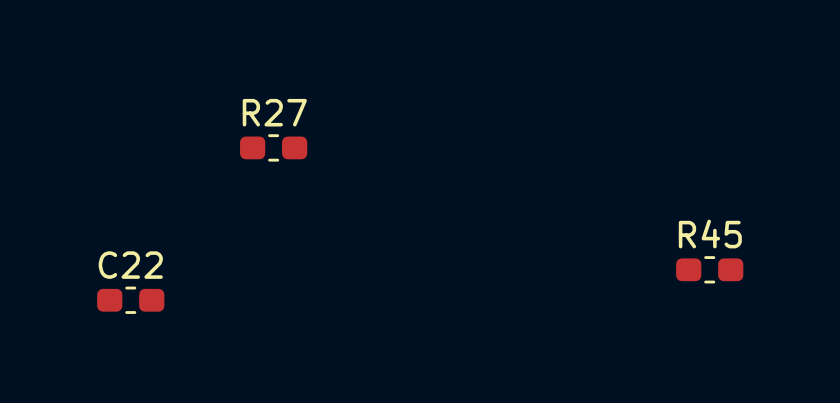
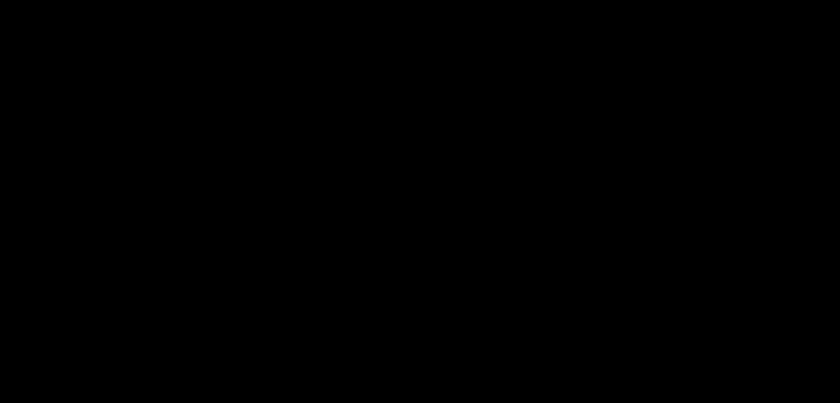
R27: (273, 147) -> none
R45: (709, 269) -> none
C22: (130, 300) -> none

